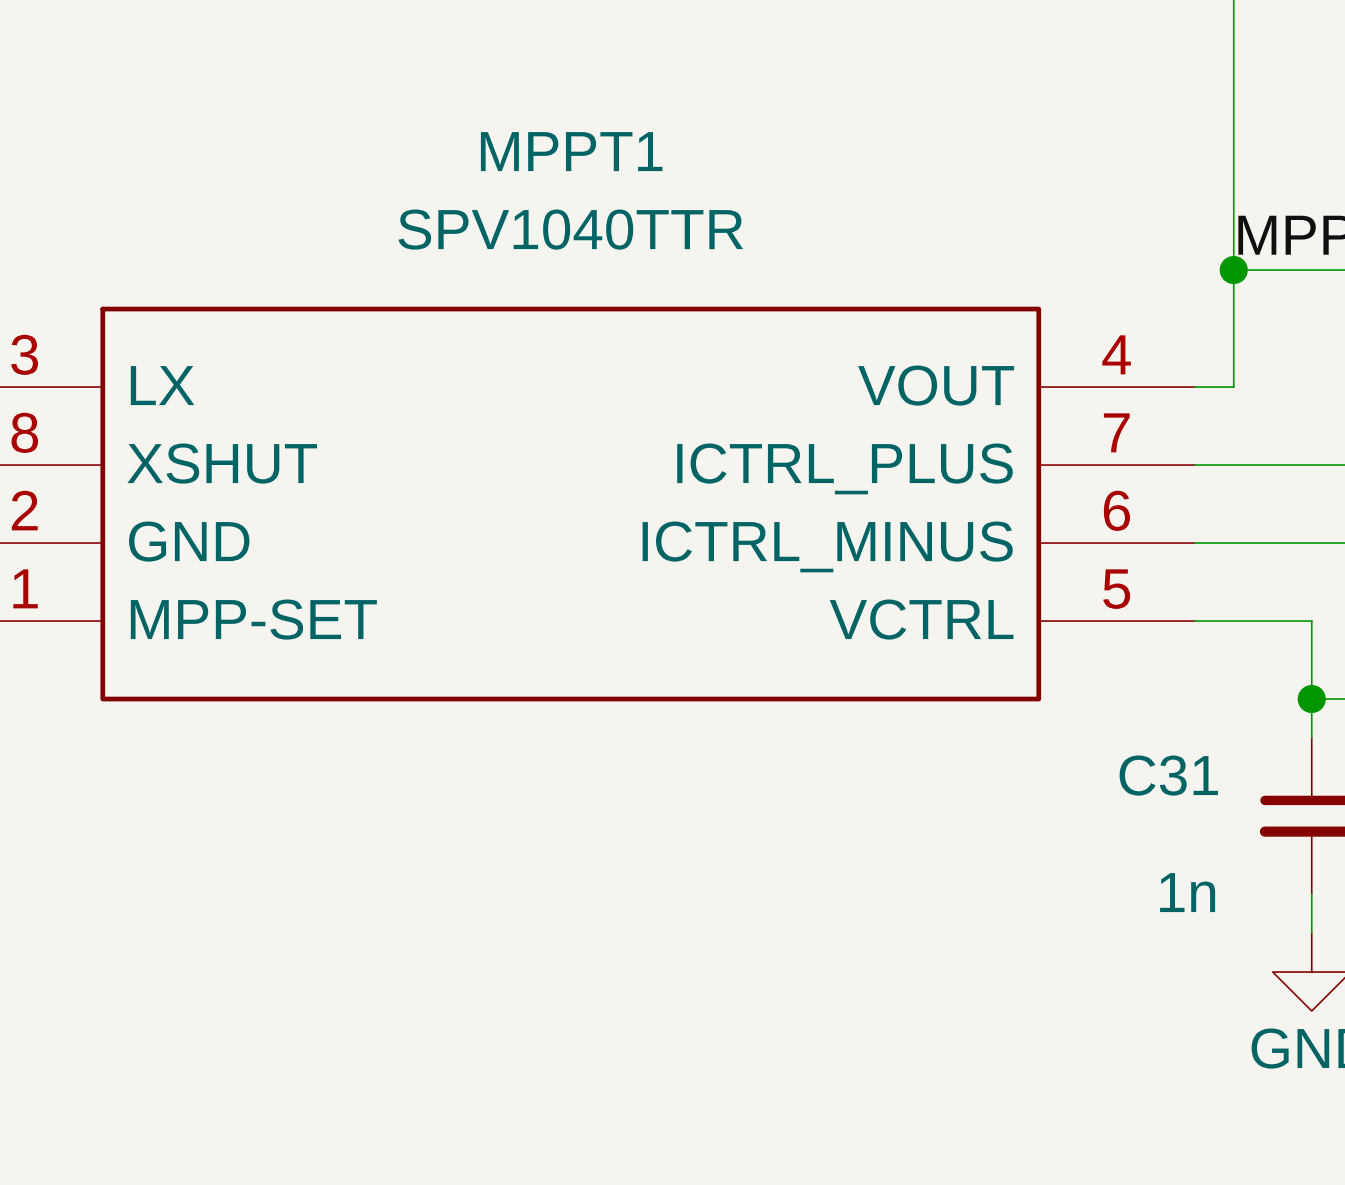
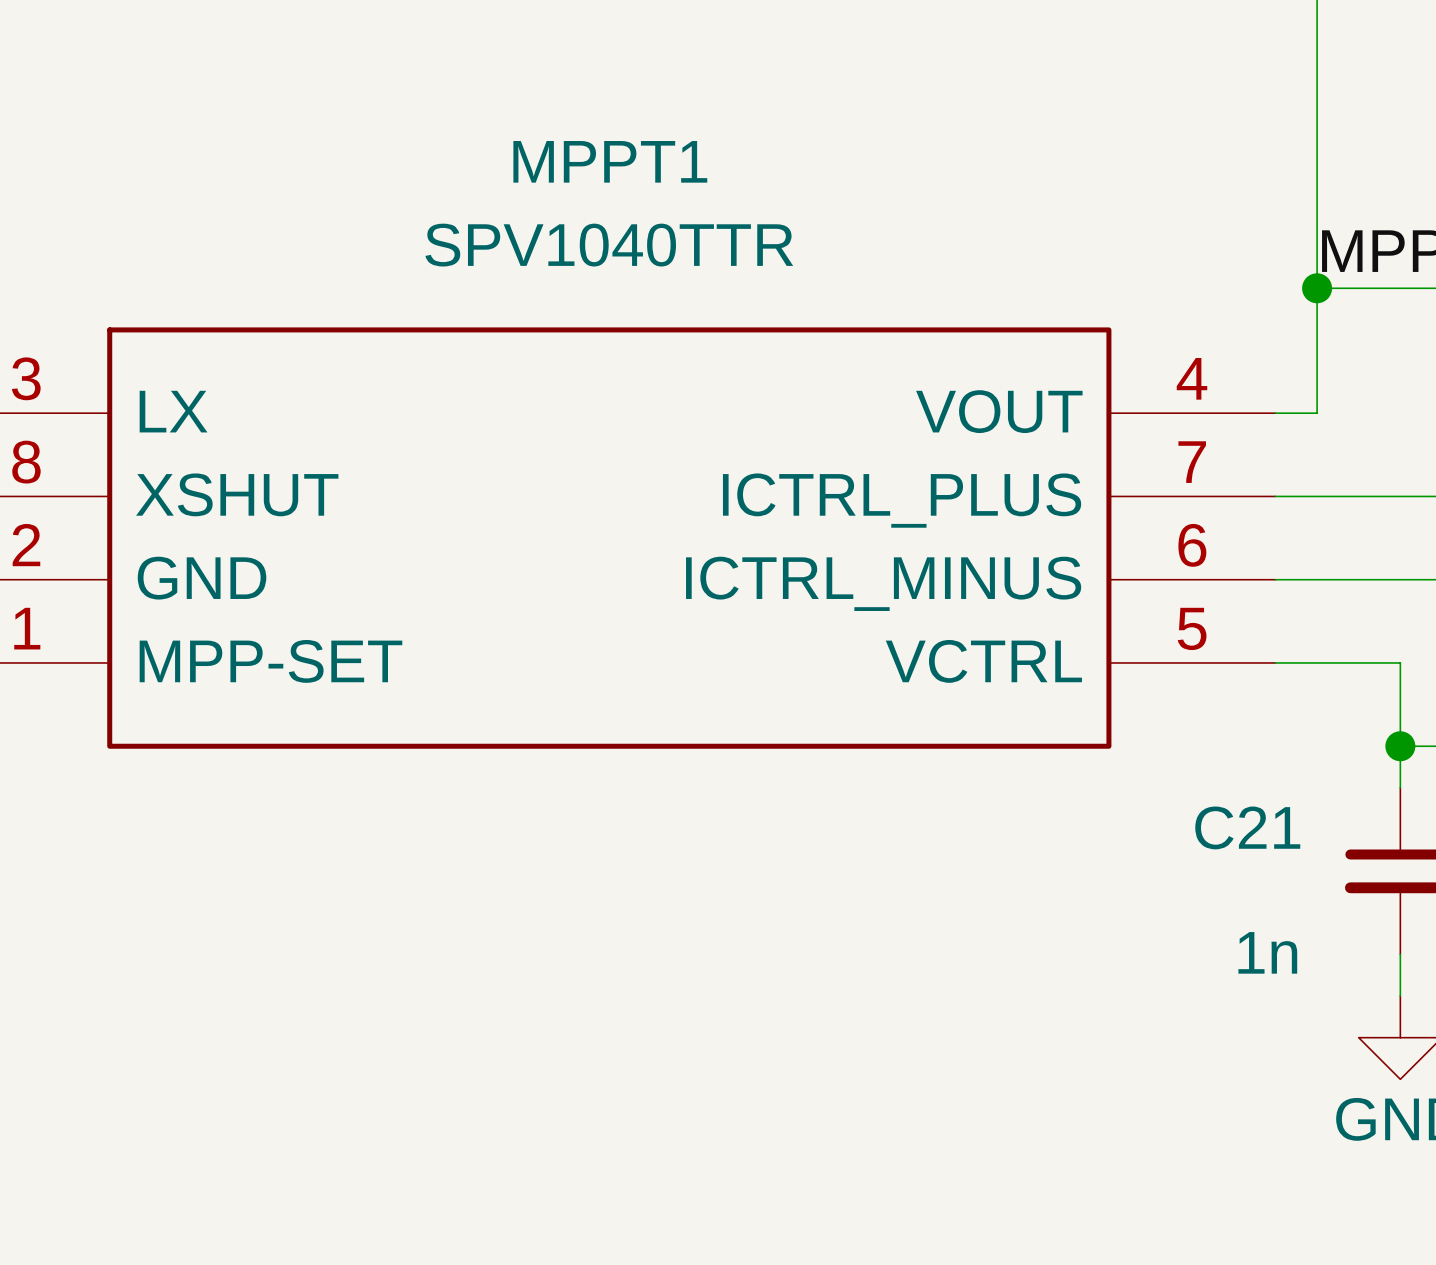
C31 name: C31 (1168, 775) -> C21 (1247, 827)

